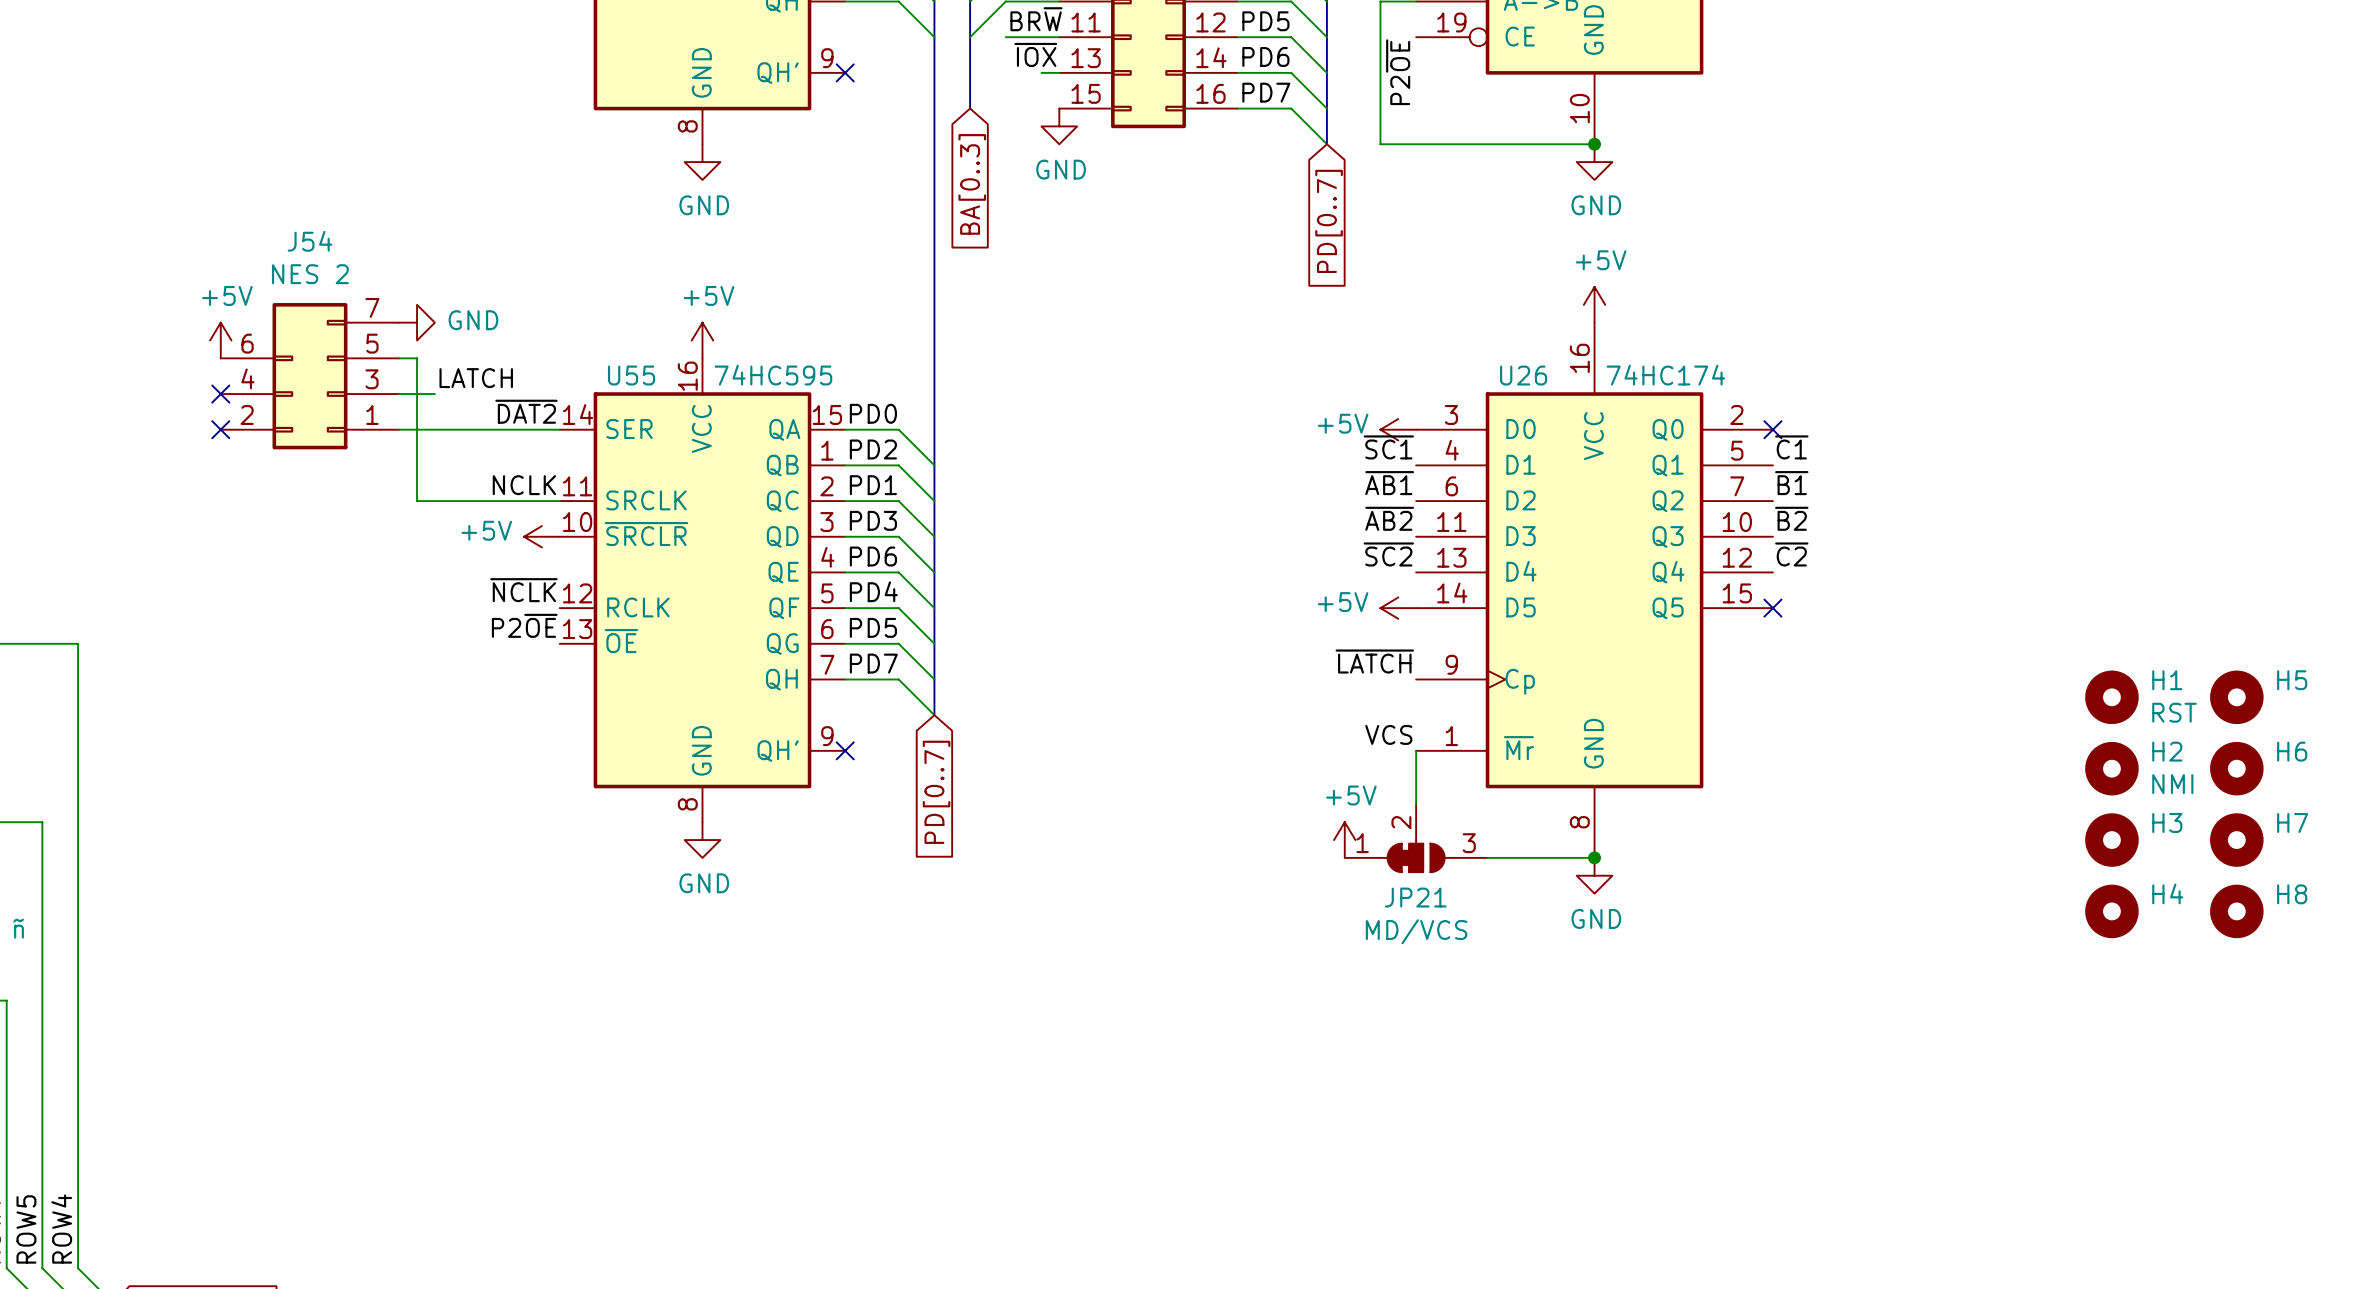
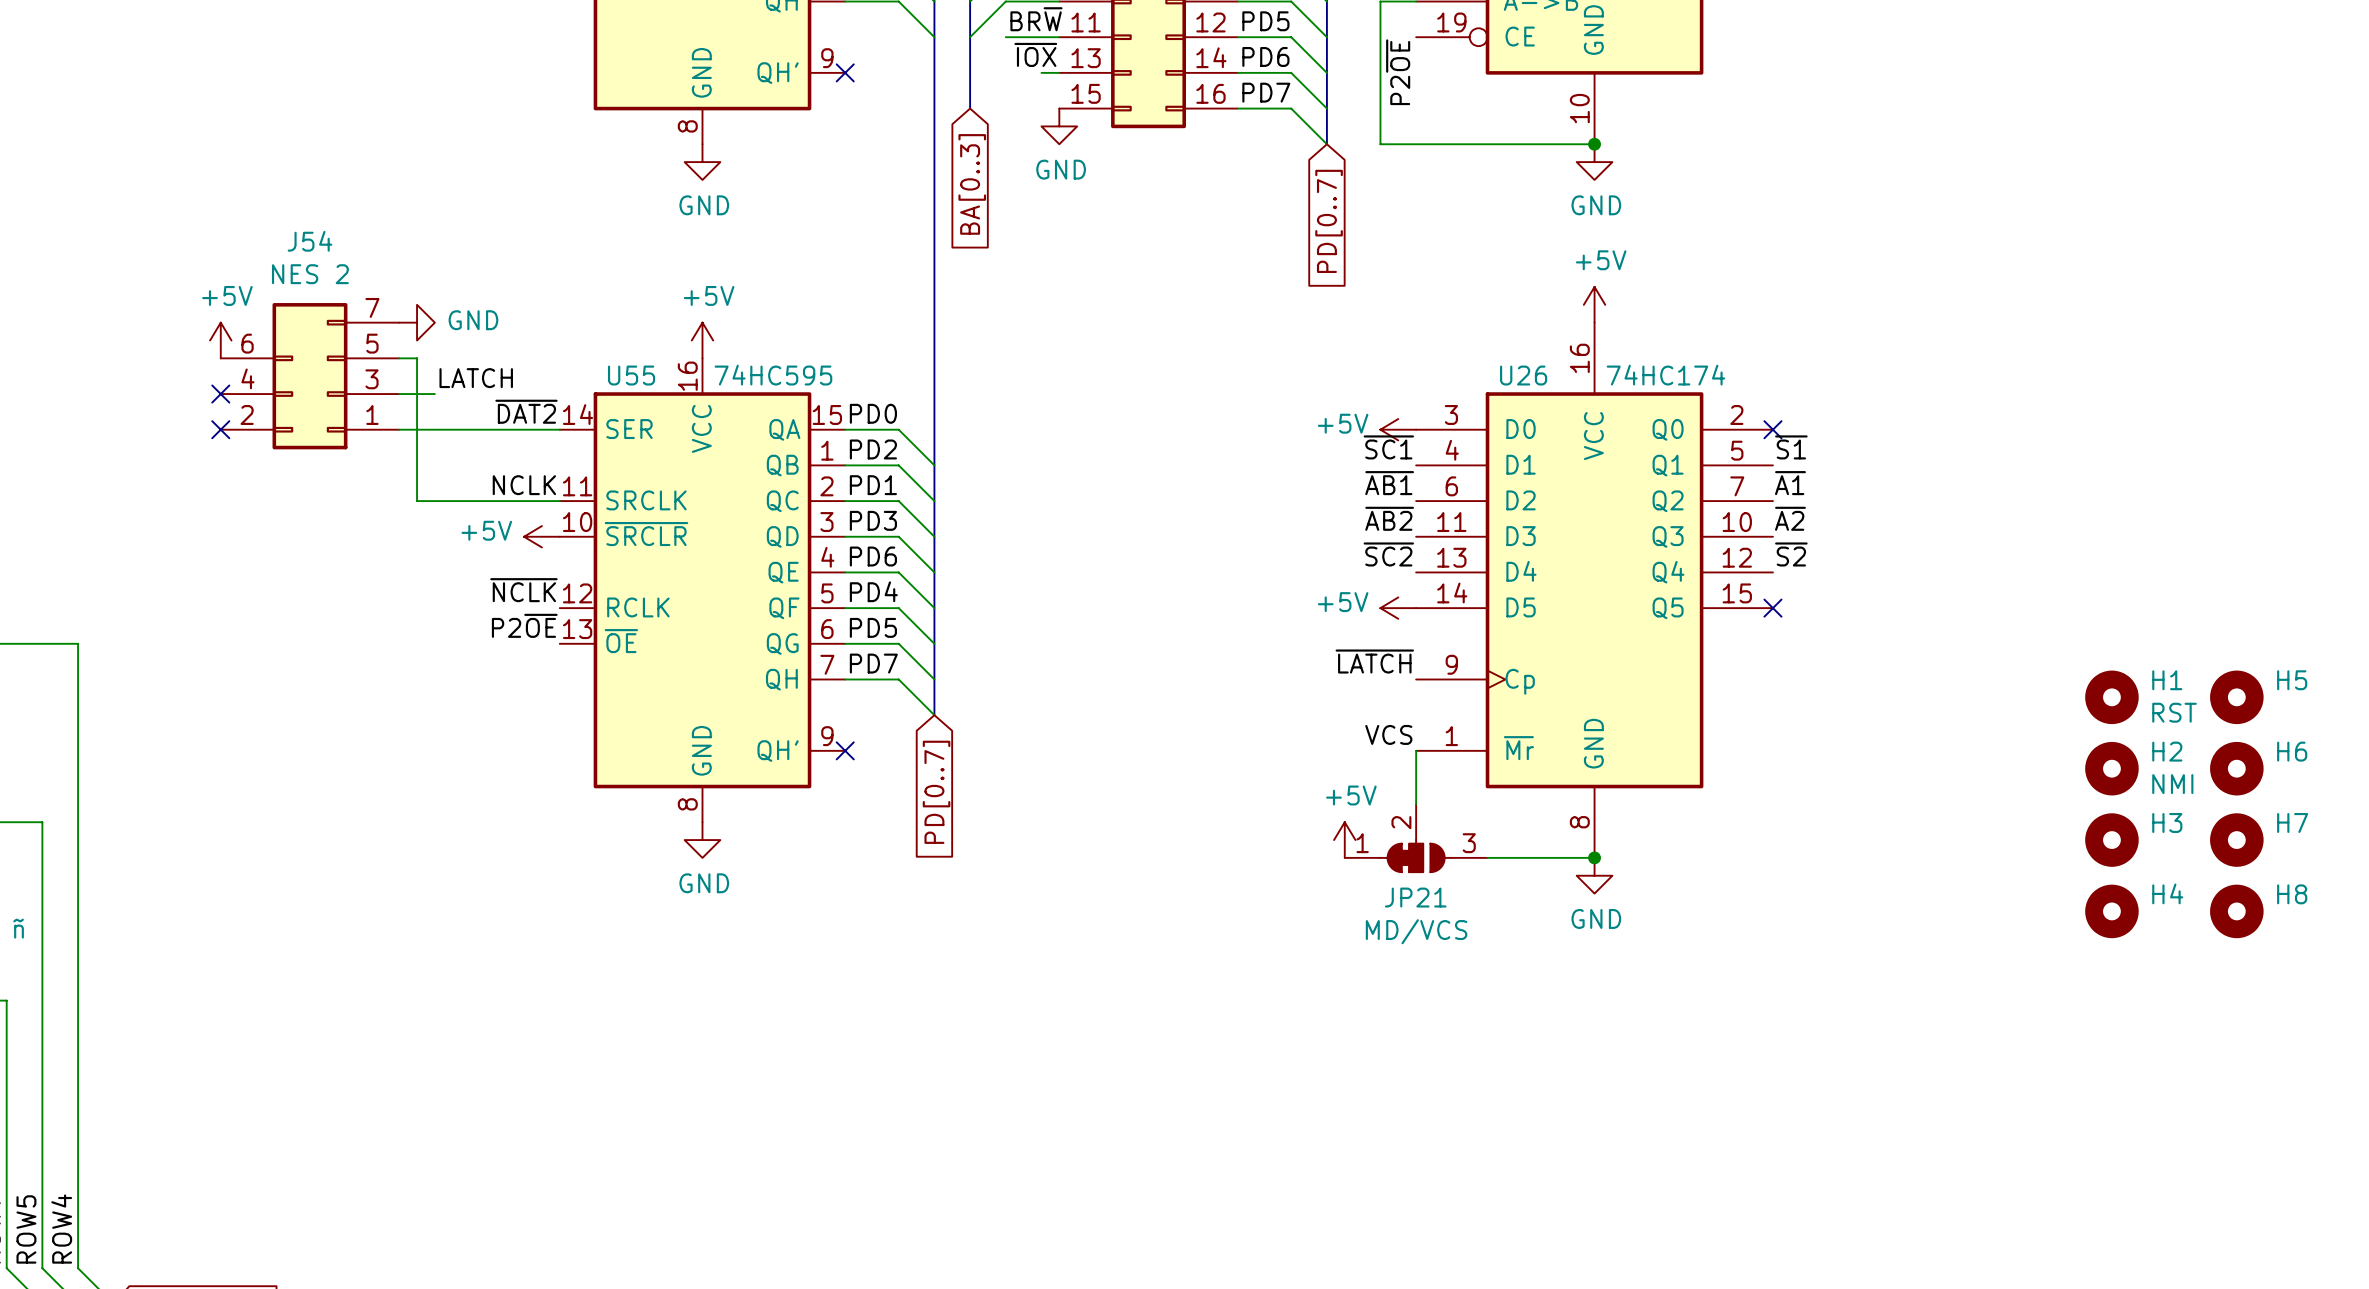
label: ~{C1} (1791, 447) -> ~{S1} (1791, 447)
label: ~{B1} (1791, 483) -> ~{A1} (1790, 483)
label: ~{B2} (1791, 518) -> ~{A2} (1790, 518)
label: ~{C2} (1791, 554) -> ~{S2} (1791, 554)

